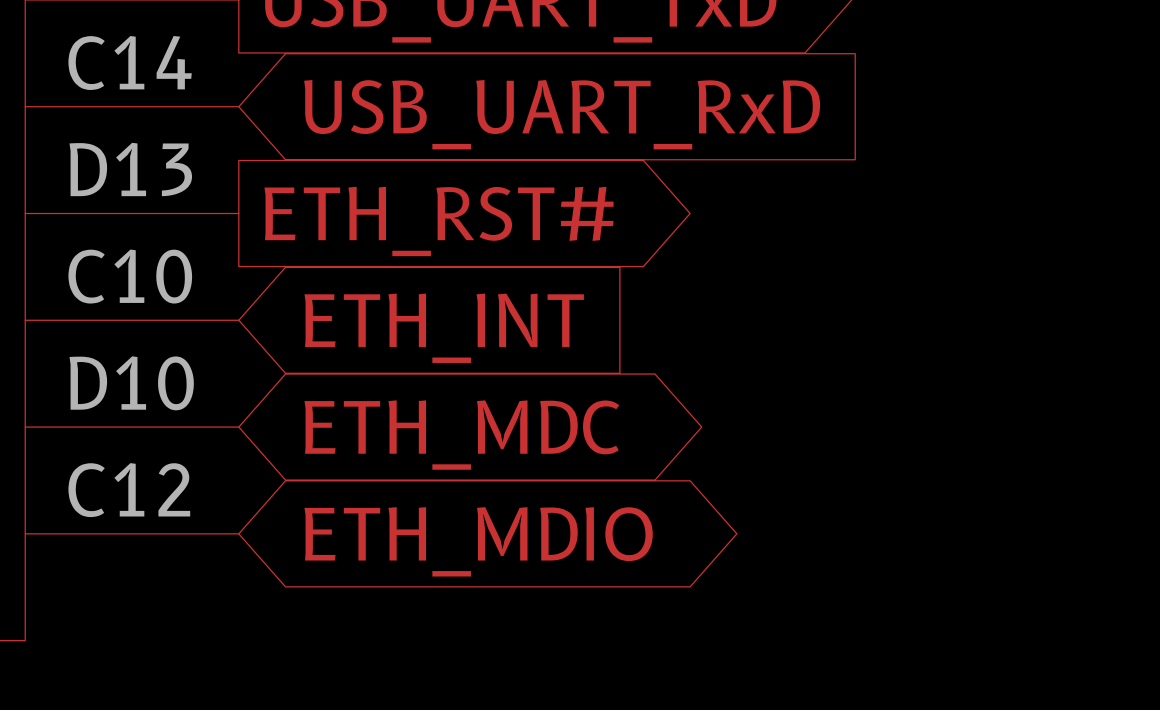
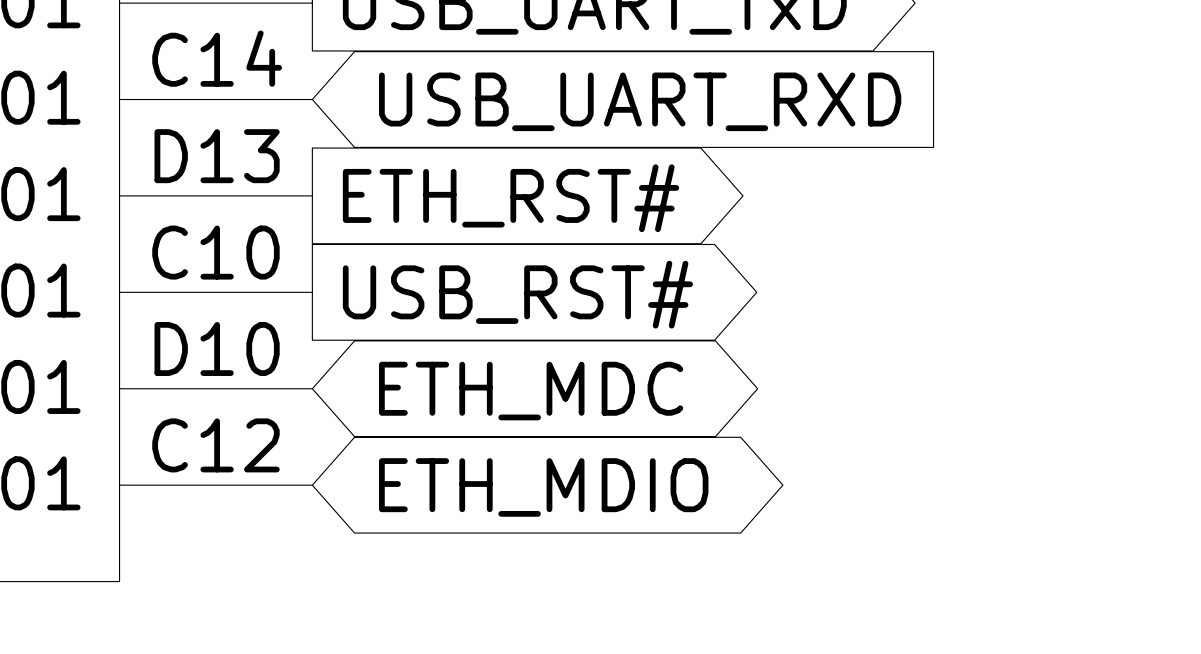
global label: USB_UART_RxD (562, 114) -> USB_UART_RXD (640, 101)
global label shape: input (444, 328) -> output (517, 294)
global label: ETH_INT (444, 328) -> USB_RST# (517, 294)

